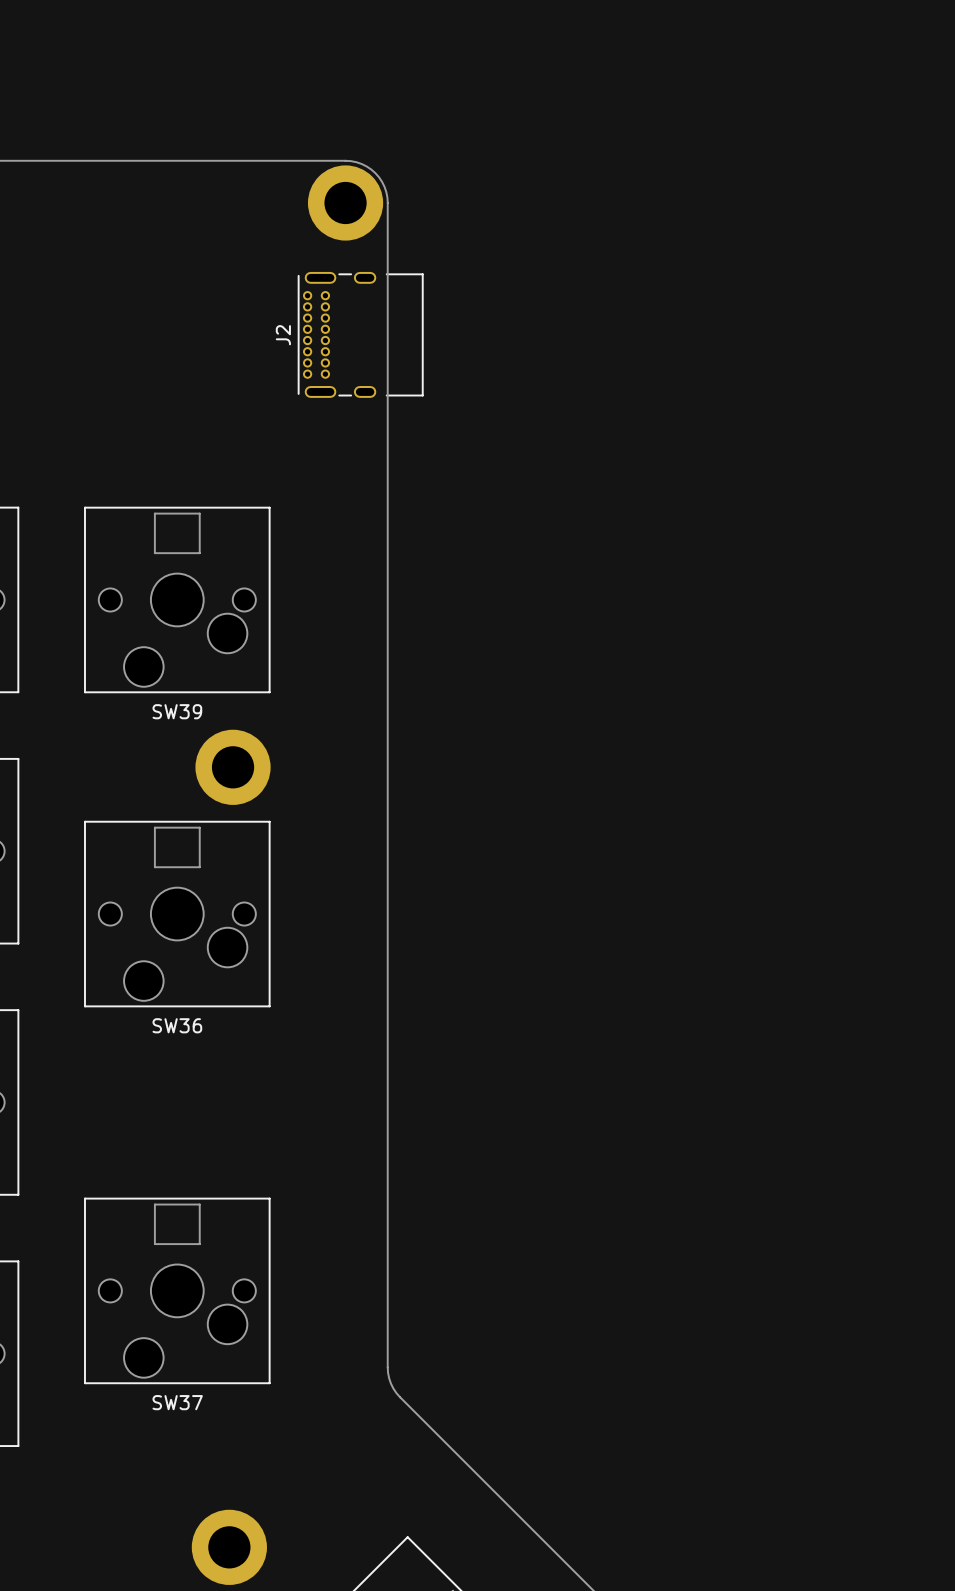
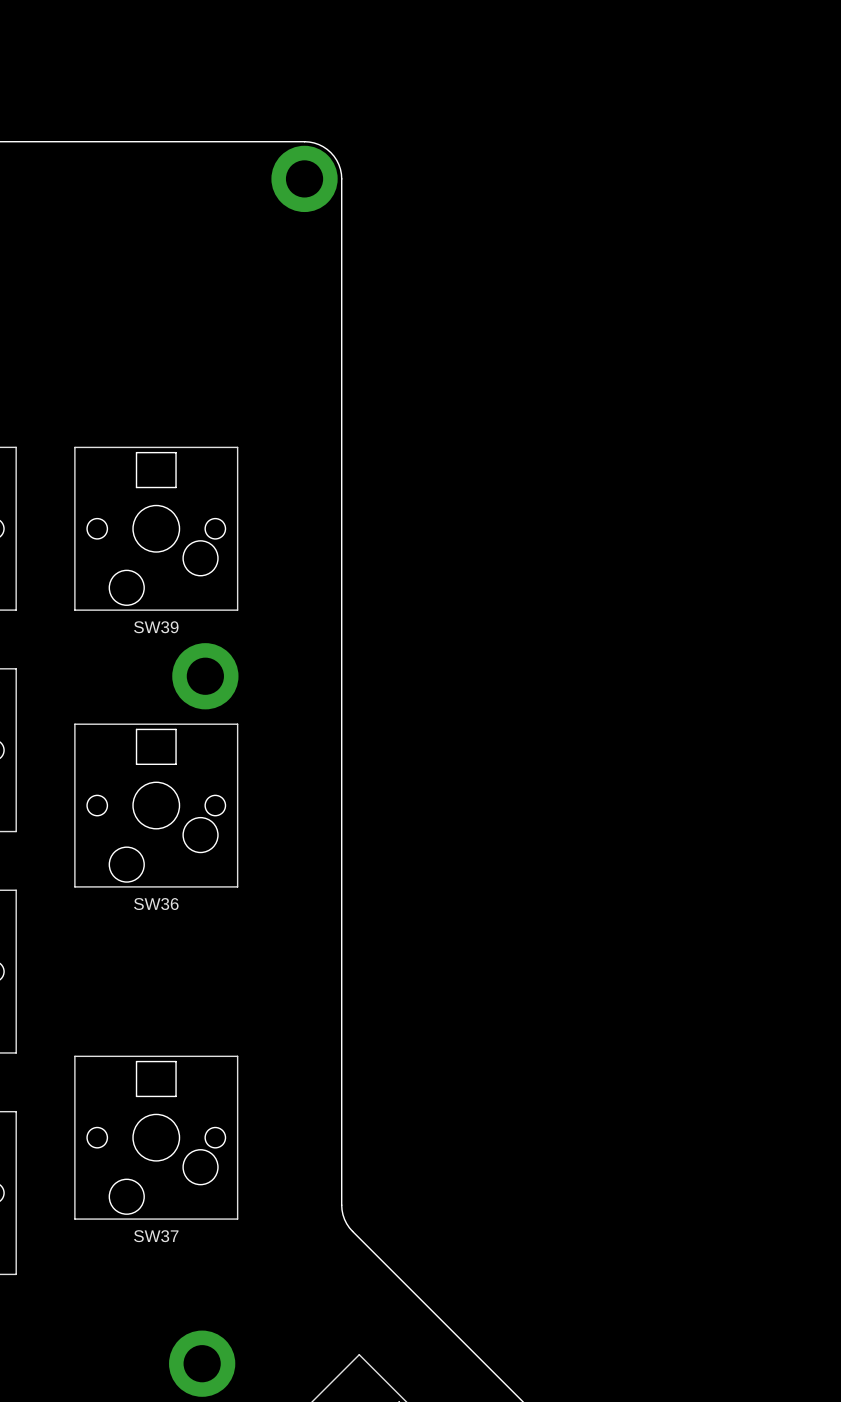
J2: (360, 334) -> none

